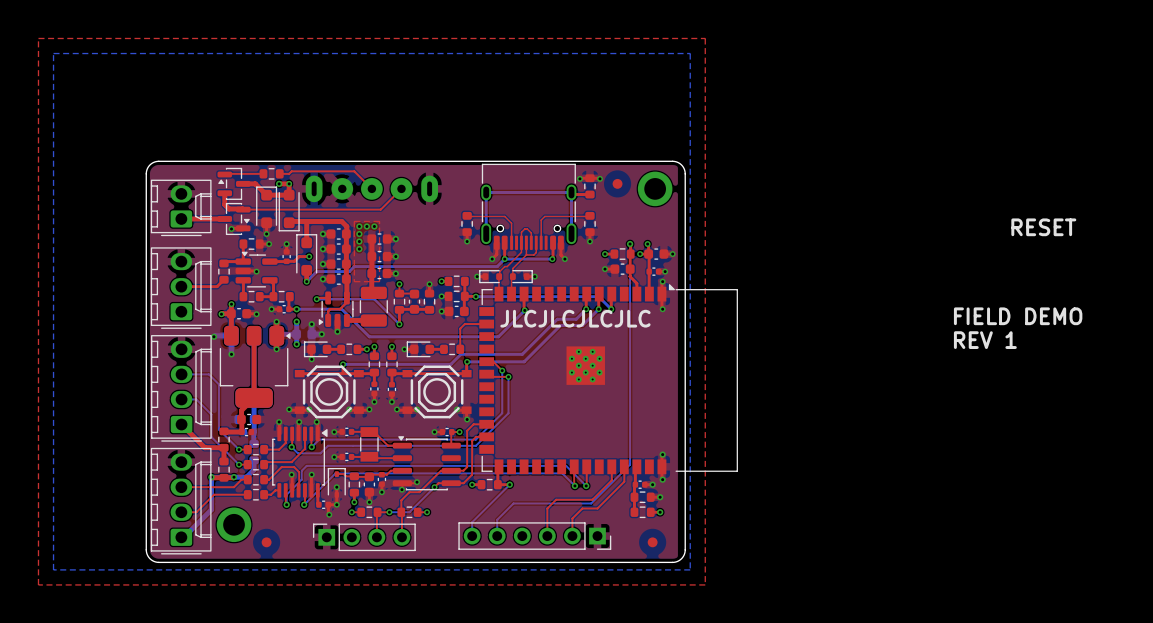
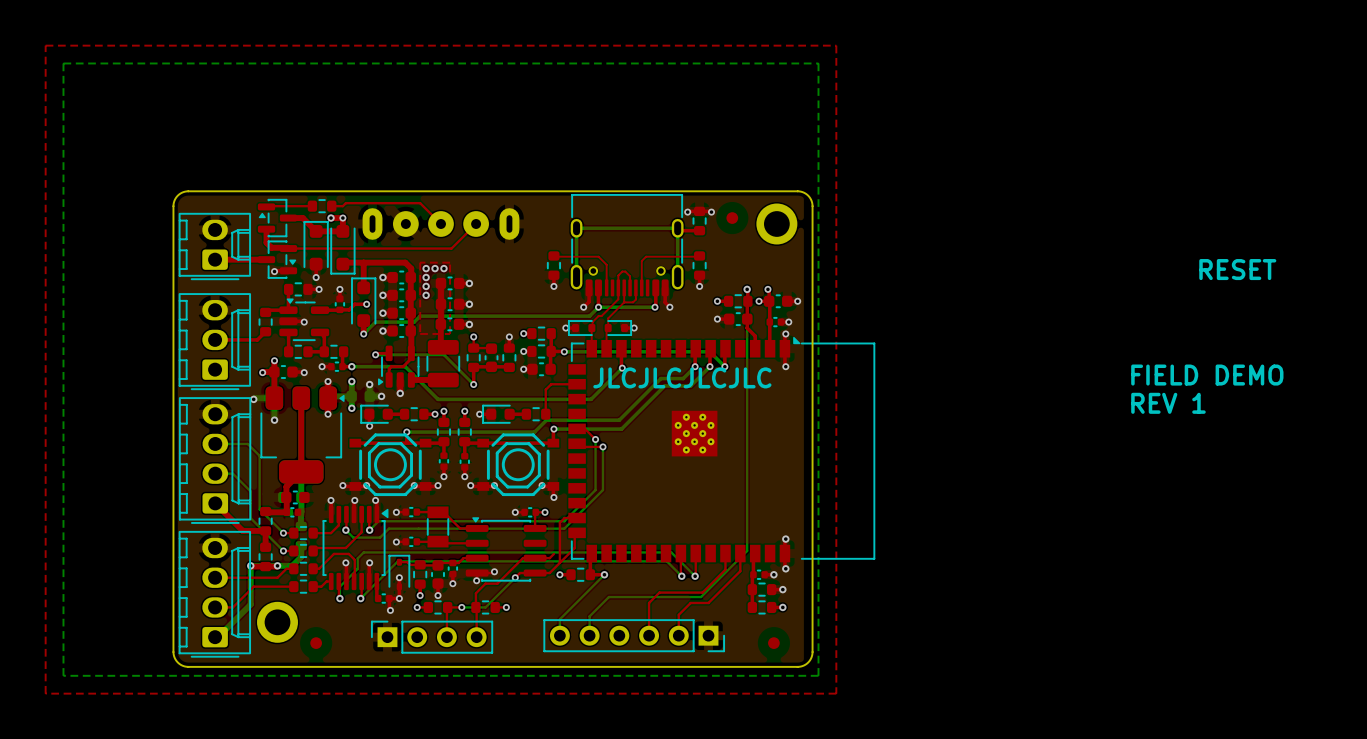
top track: (486, 424) (473, 424) (467, 430) (467, 467) -> none
top track: none -> (574, 535) (574, 548) (559, 562)

